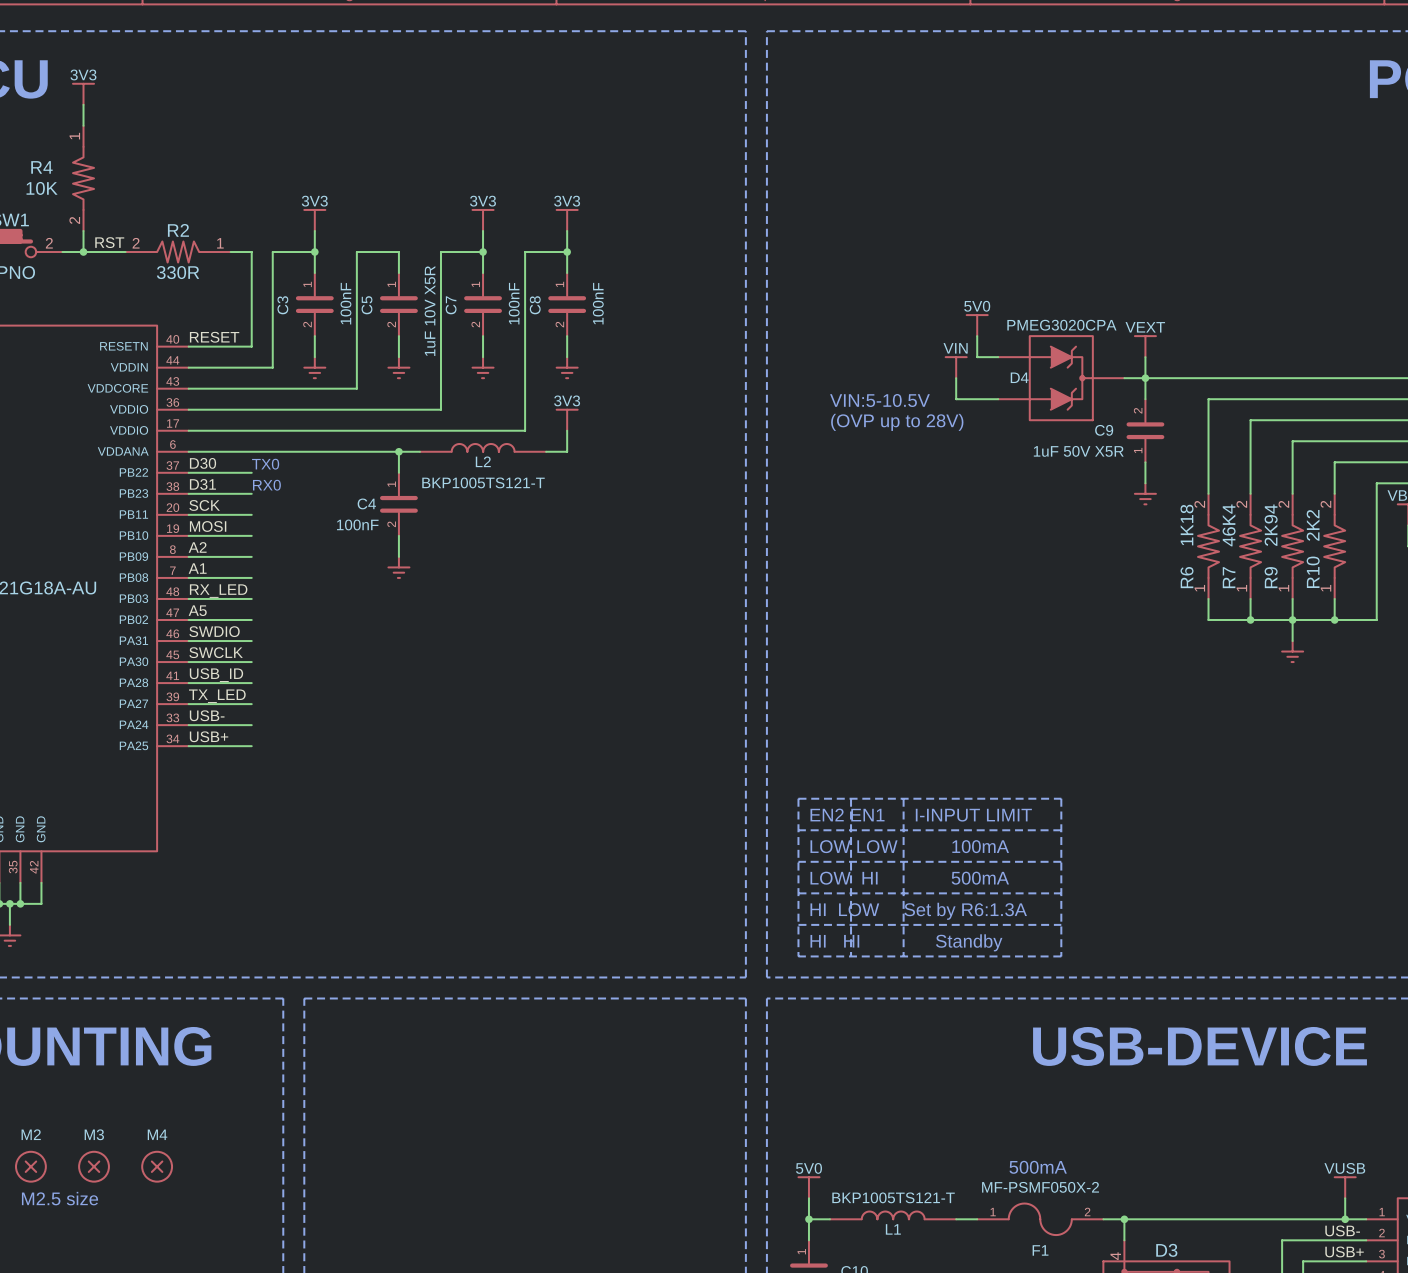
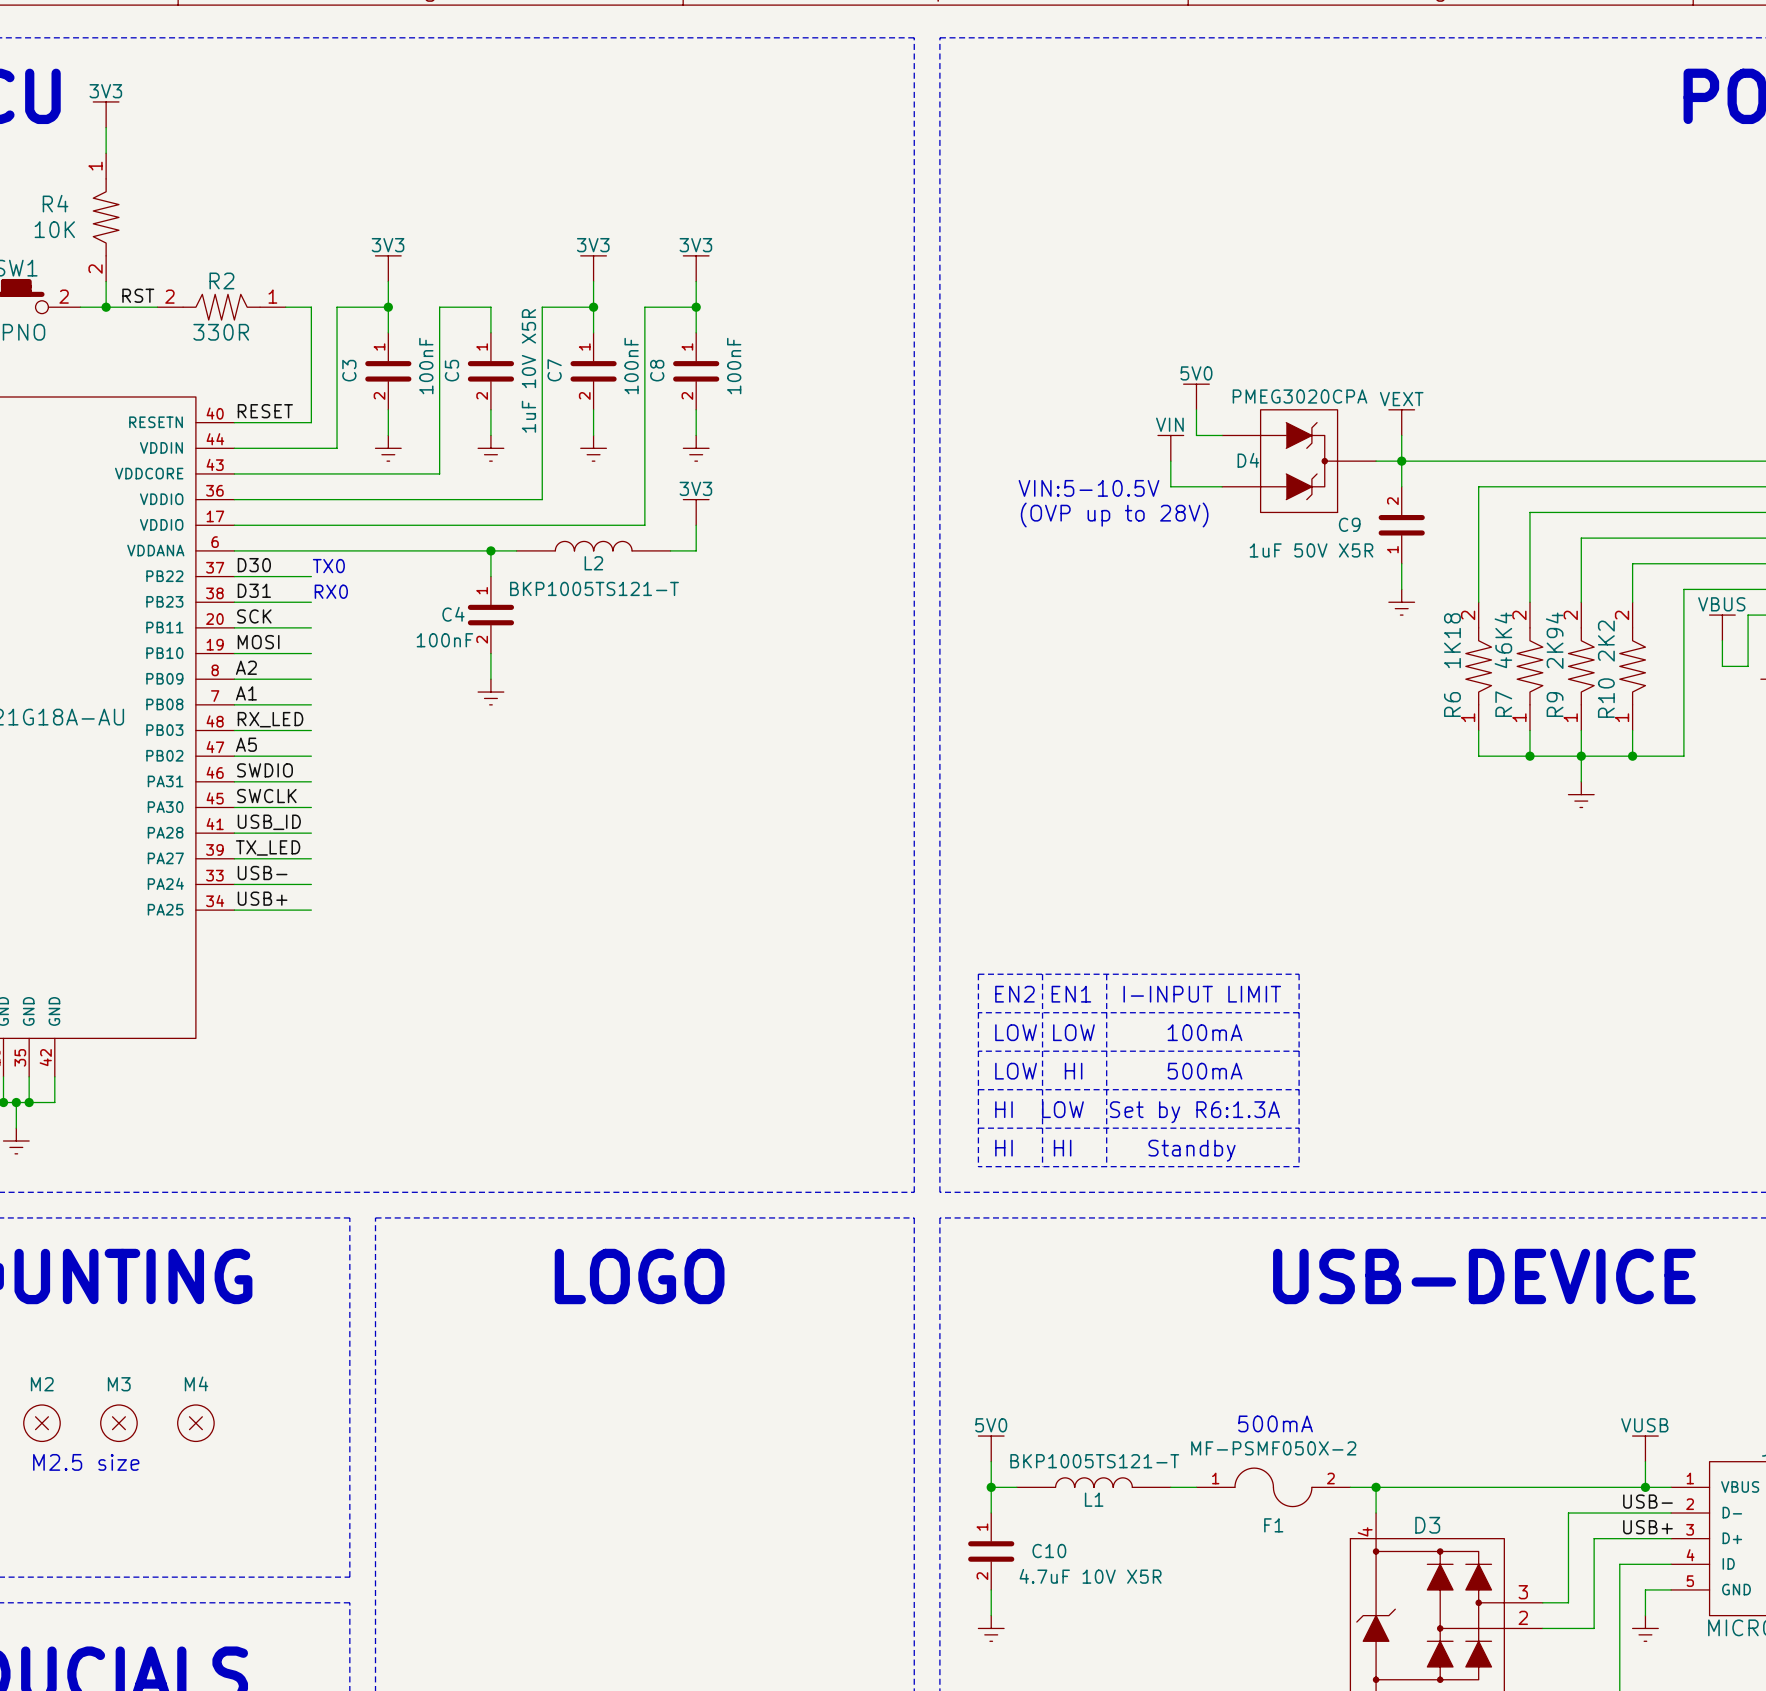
text: none -> LOGO (639, 1276)

